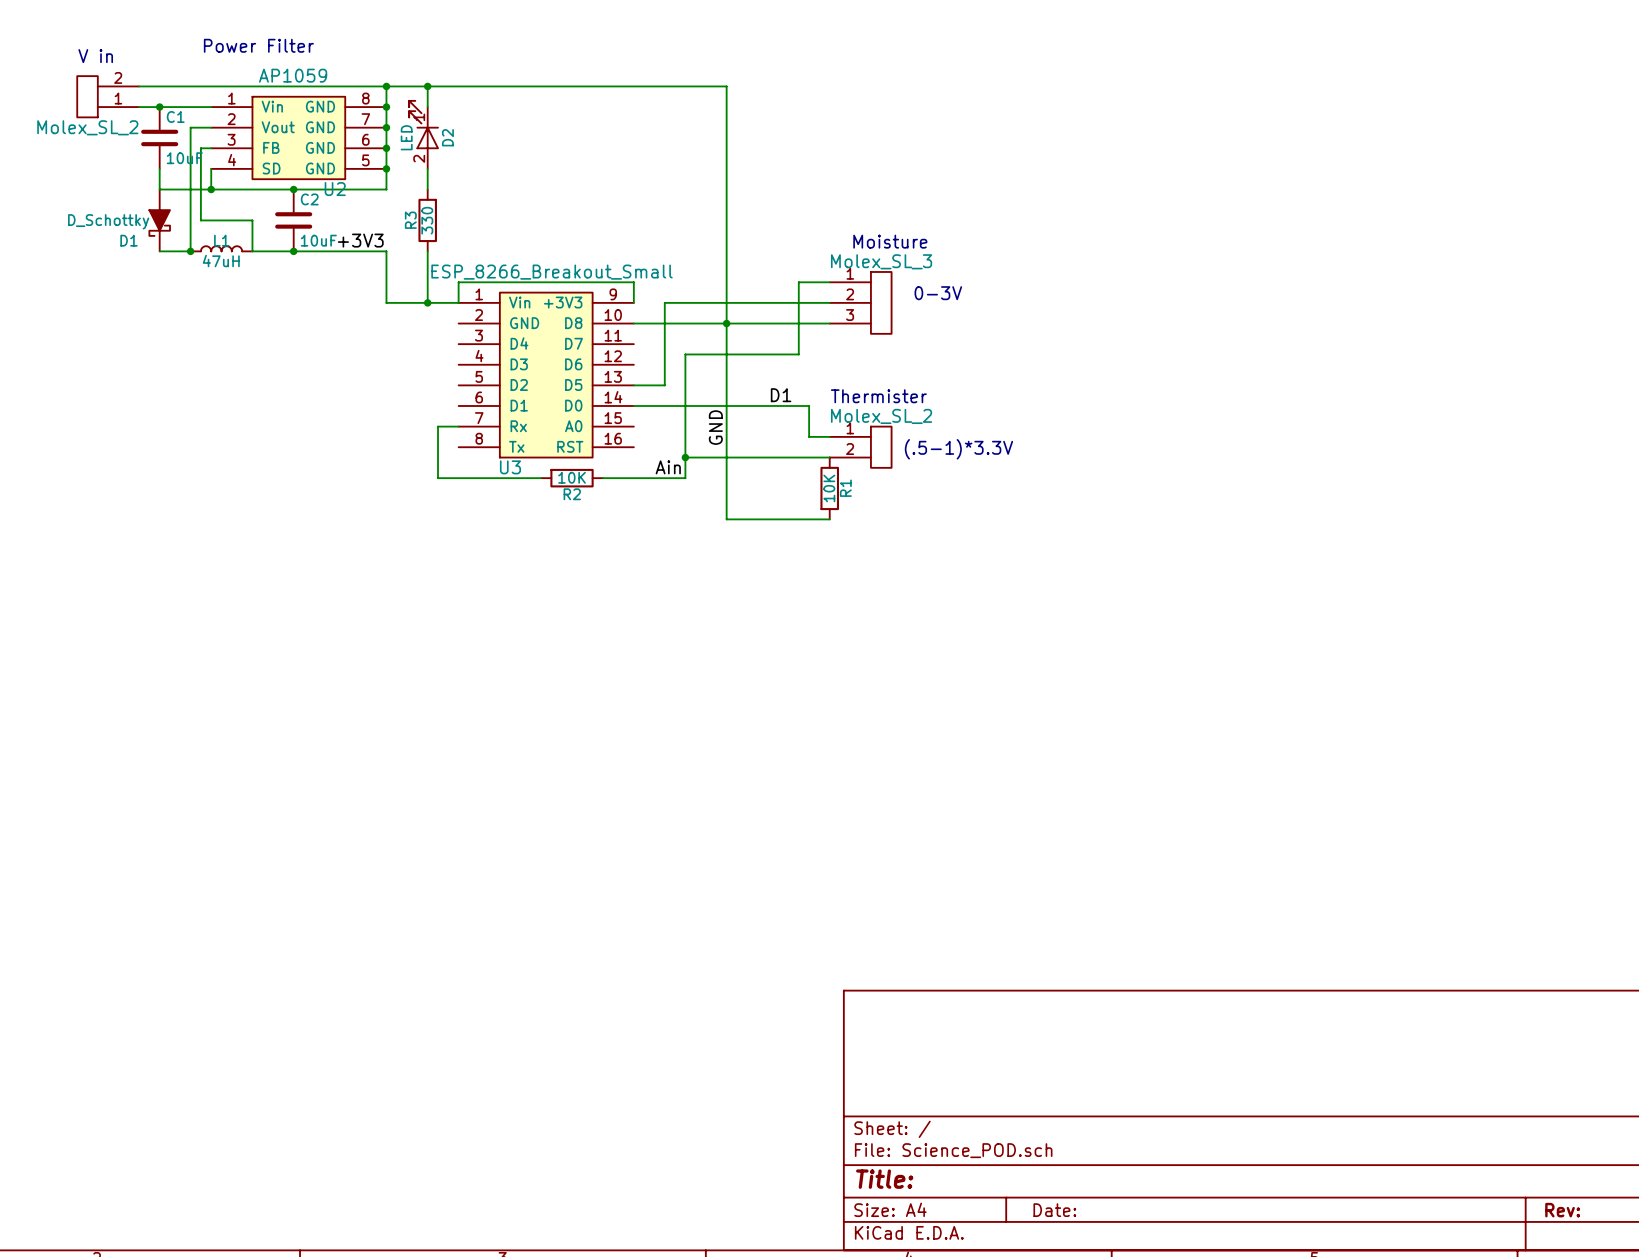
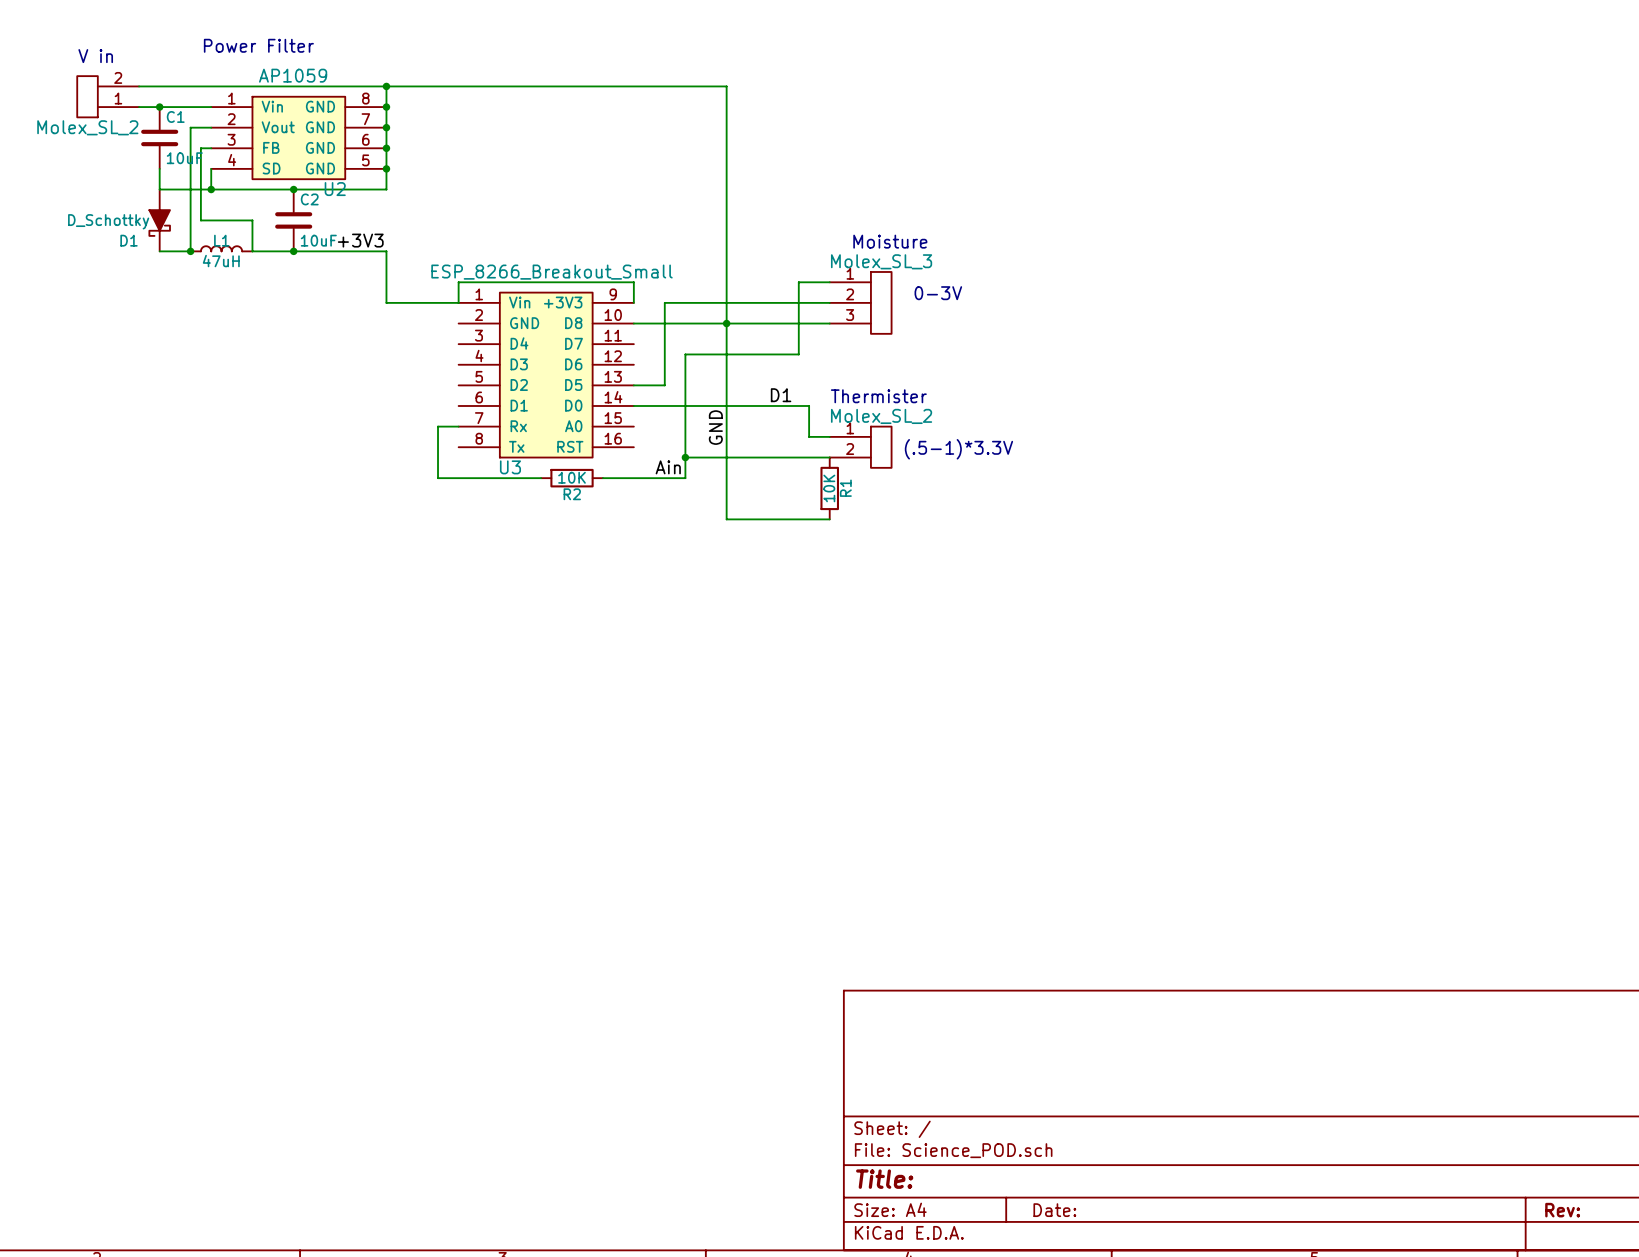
wire: (427, 86) (427, 107) -> none
junction: (427, 86) -> none
D2: LED (423, 134) -> none
wire: (427, 168) (427, 189) -> none
R3: 330 (427, 220) -> none
wire: (427, 251) (427, 302) -> none
junction: (427, 302) -> none

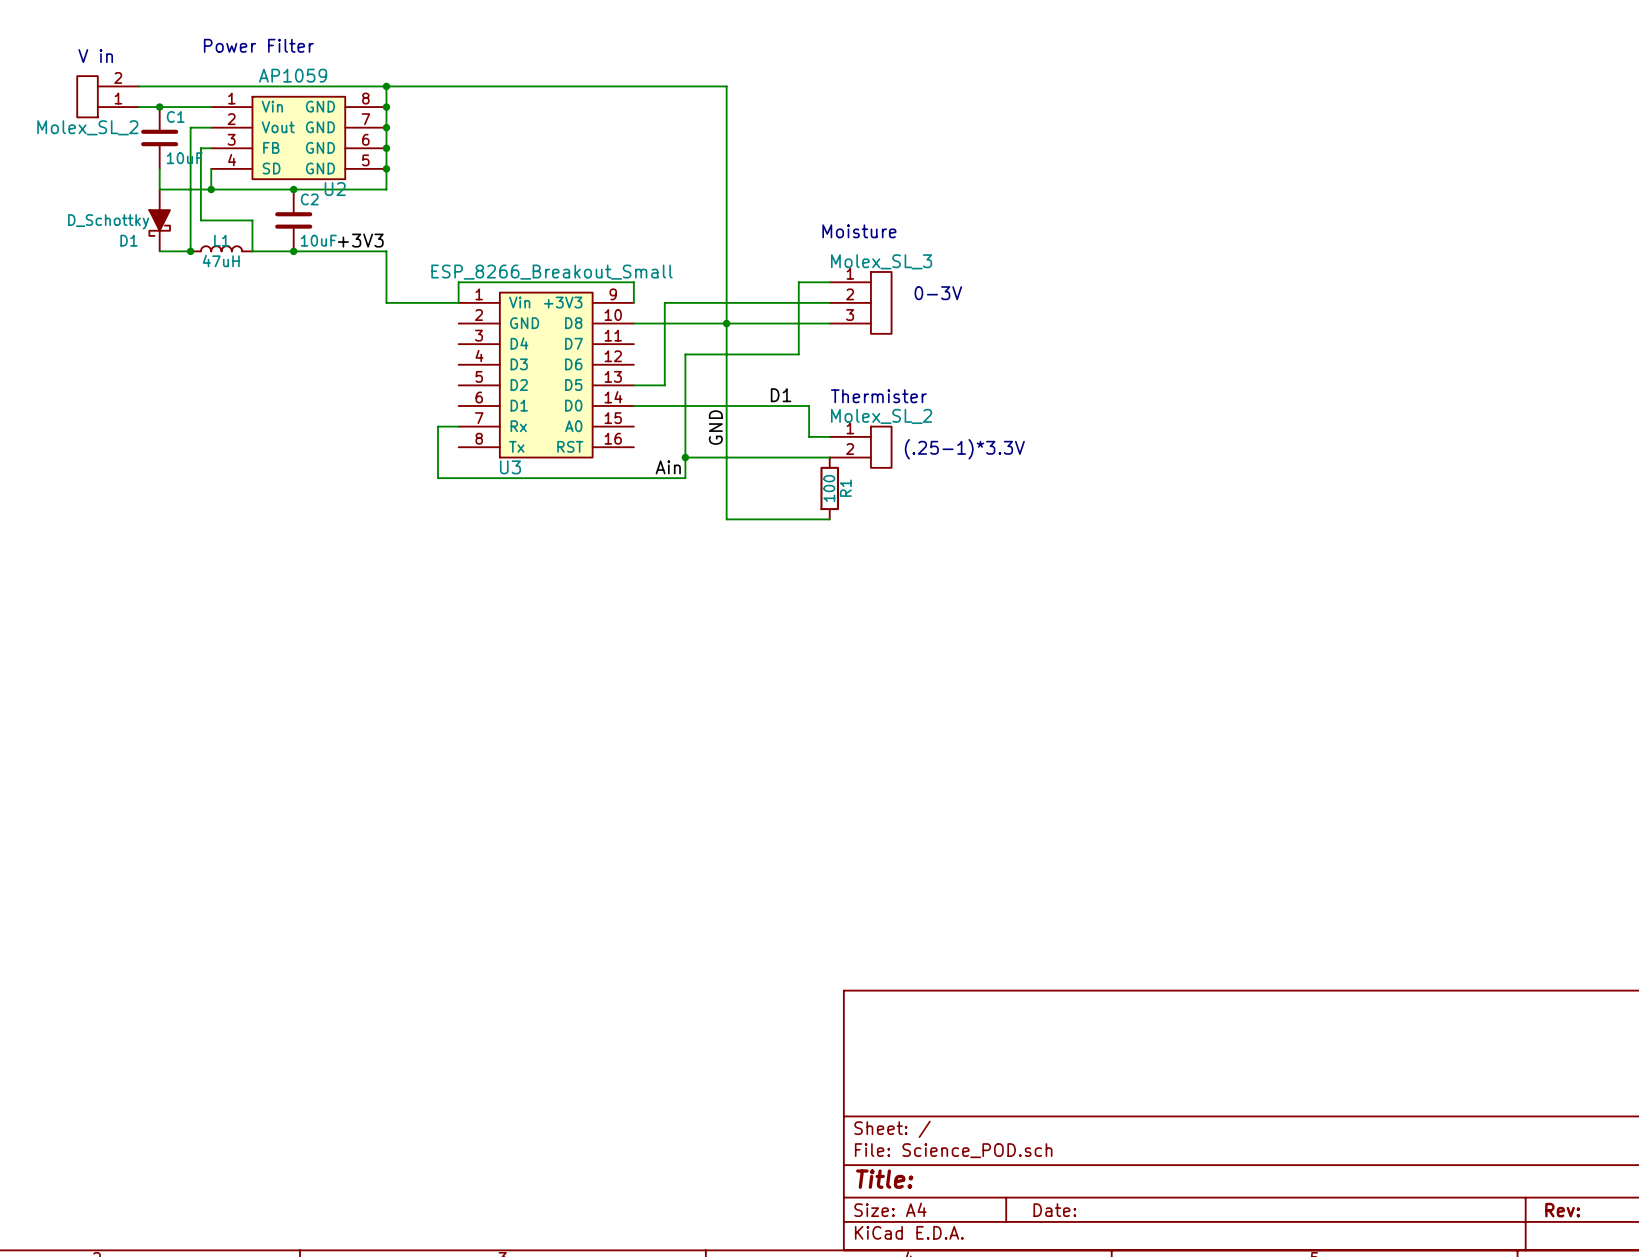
text position: Moisture (890, 241) -> Moisture (859, 231)
text: (.5-1)*3.3V (958, 449) -> (.25-1)*3.3V (964, 449)
R2: 10K (572, 478) -> none
R1 value: 10K (829, 488) -> 100 (829, 488)

